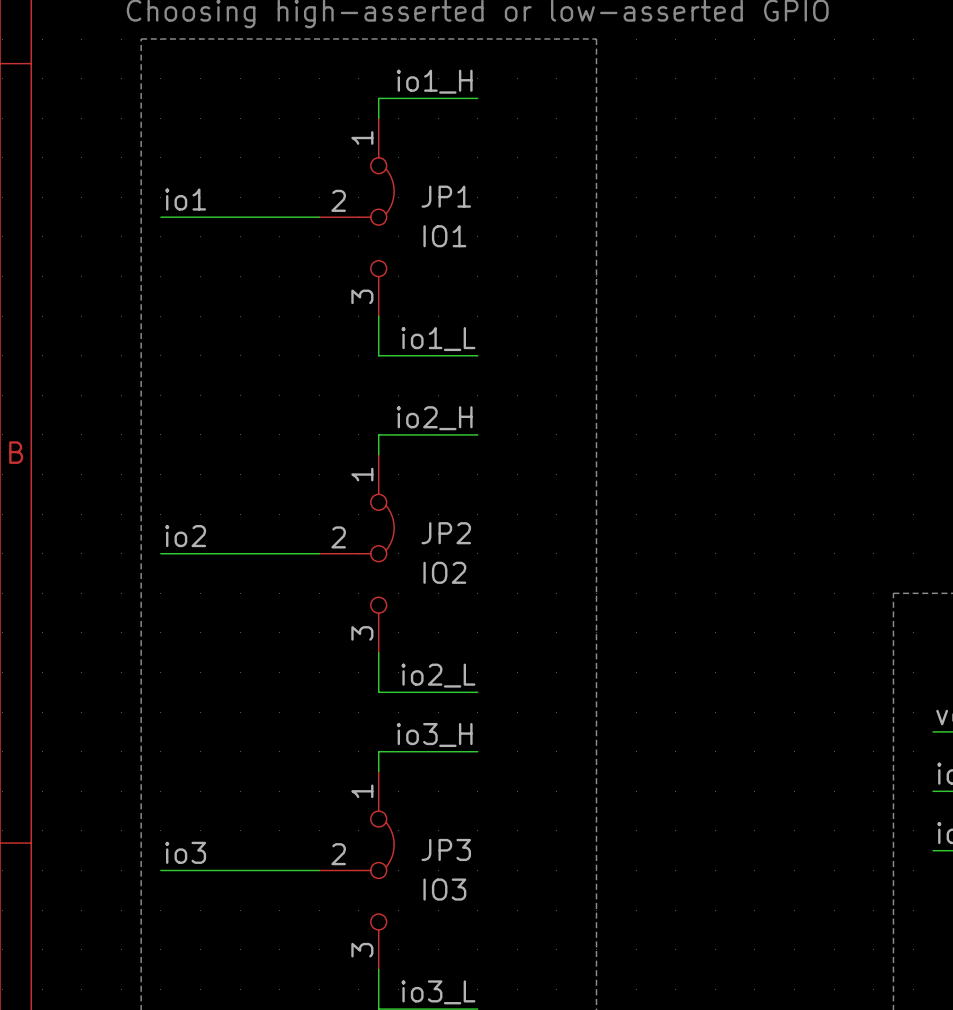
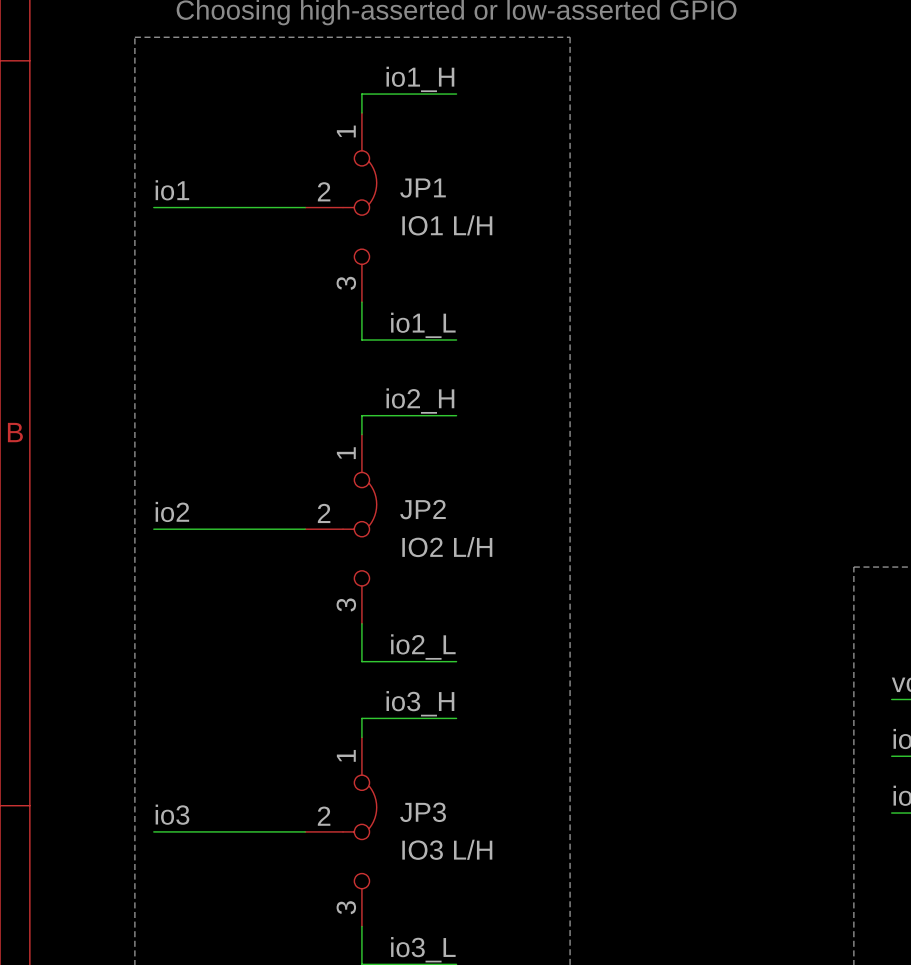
JP1 value: IO1 (444, 236) -> IO1 L/H (447, 225)
JP2 value: IO2 (444, 572) -> IO2 L/H (447, 547)
JP3 value: IO3 (444, 889) -> IO3 L/H (447, 849)

